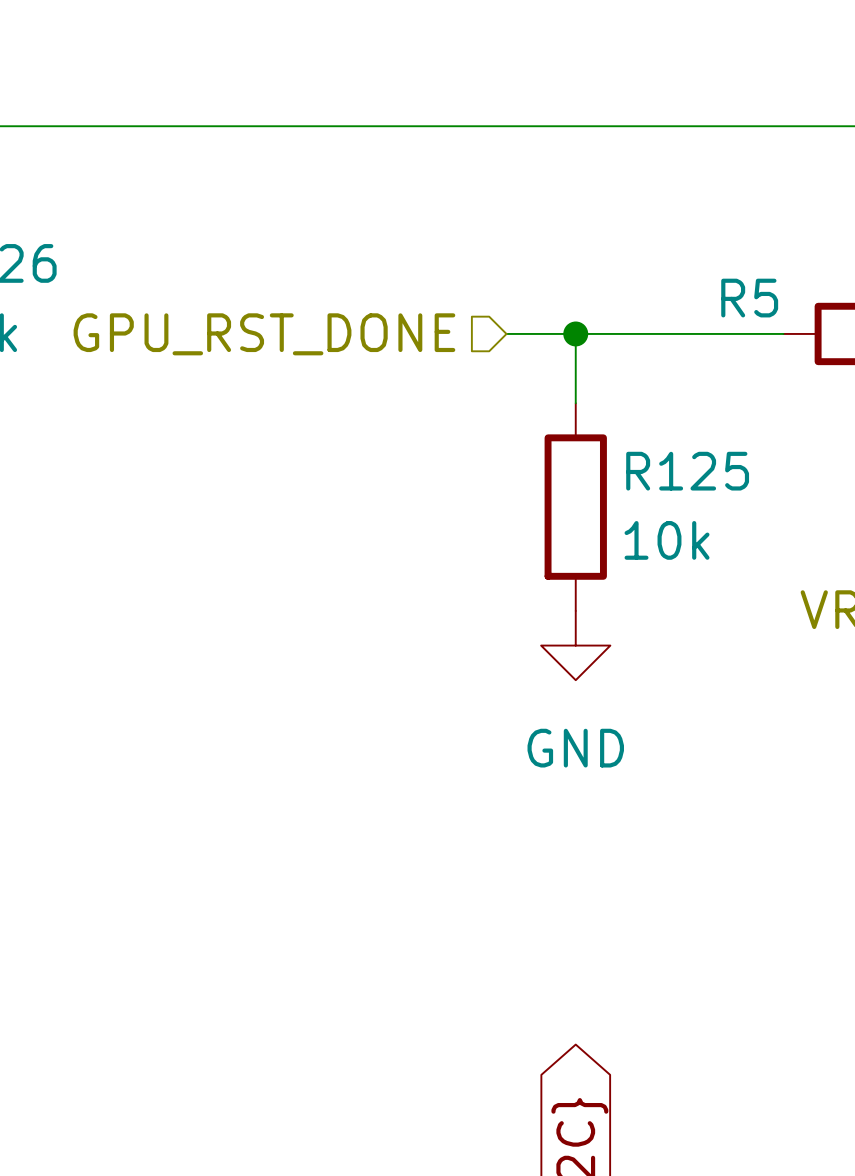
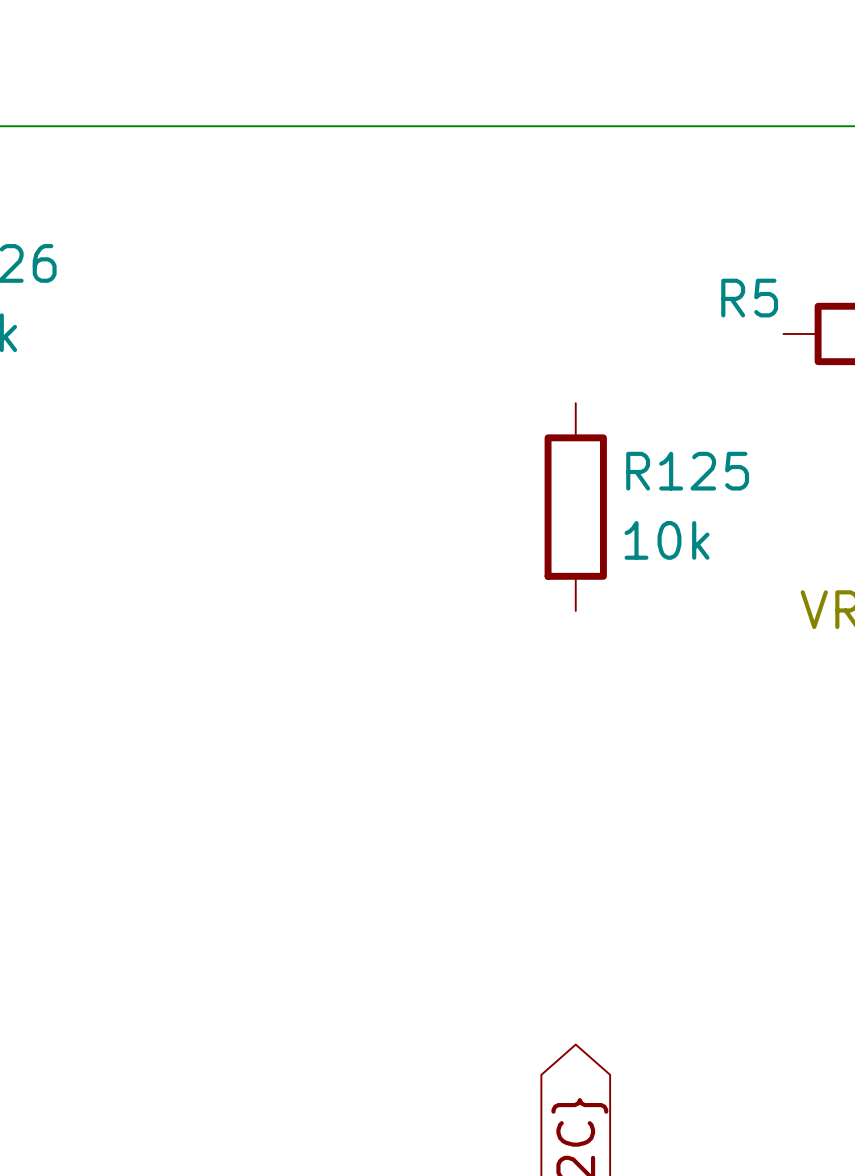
wire: (506, 333) (783, 333) -> none
wire: (575, 333) (575, 403) -> none
junction: (575, 333) -> none
hierarchical label: GPU_RST_DONE (264, 334) -> none
power symbol: GND (575, 645) -> none

